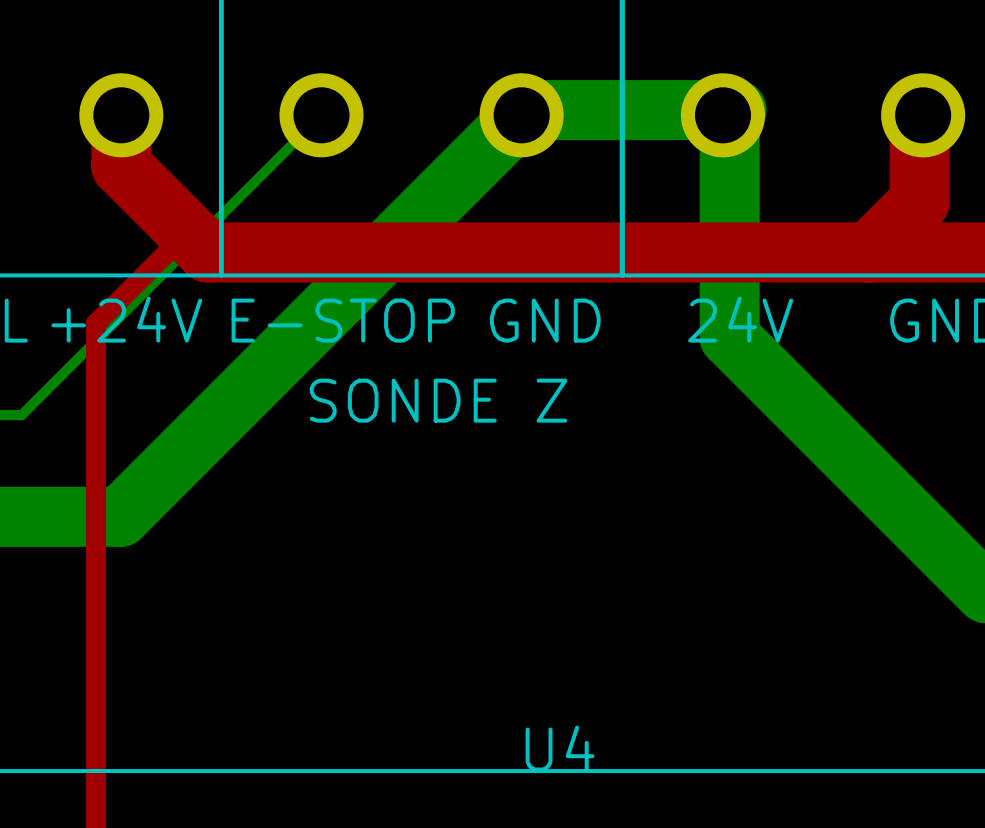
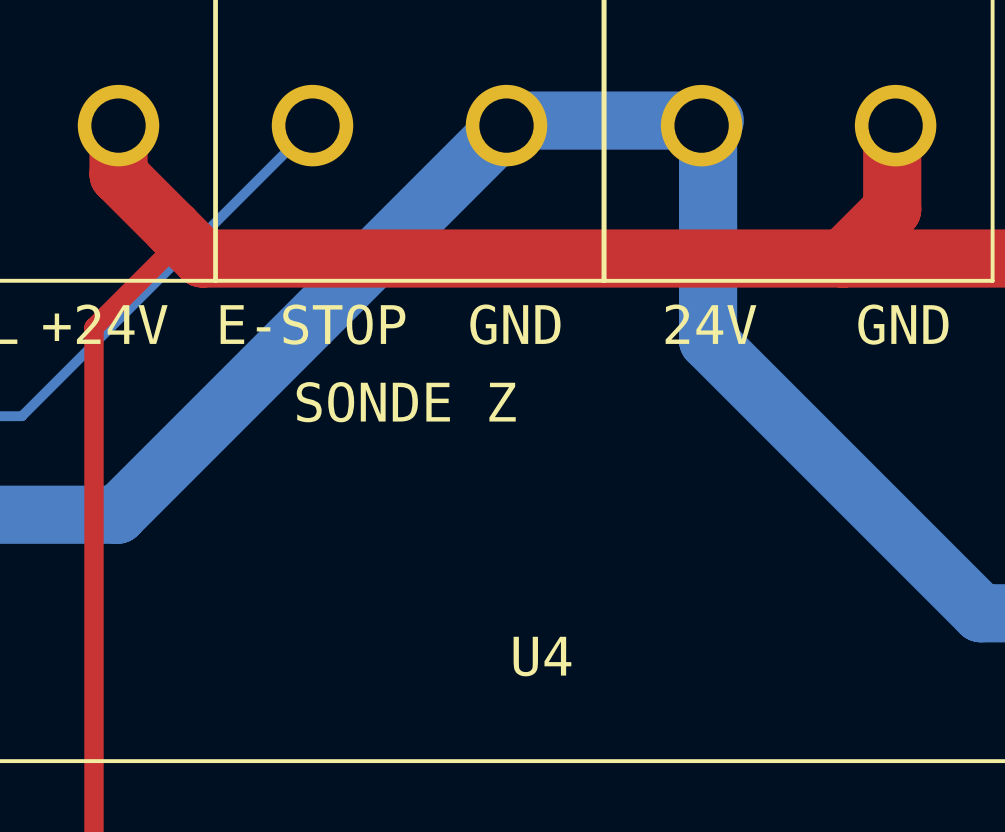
U4 name position: U4 (560, 748) -> U4 (542, 656)

